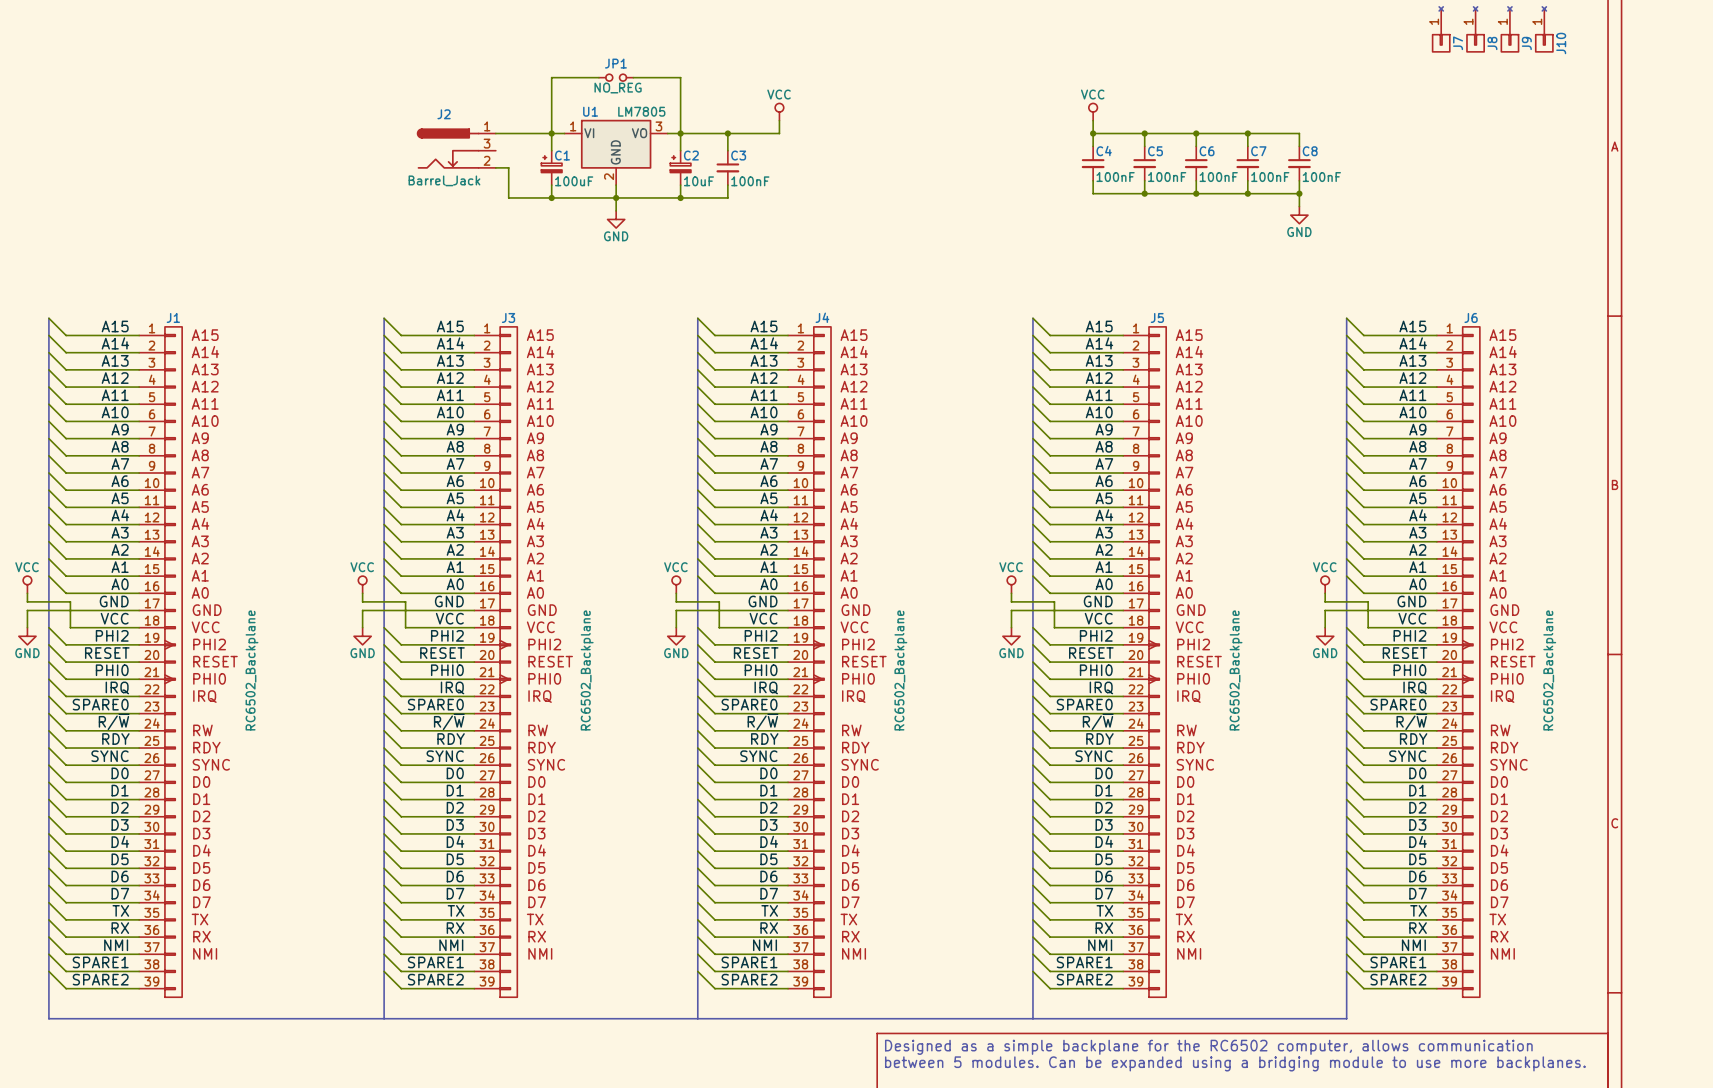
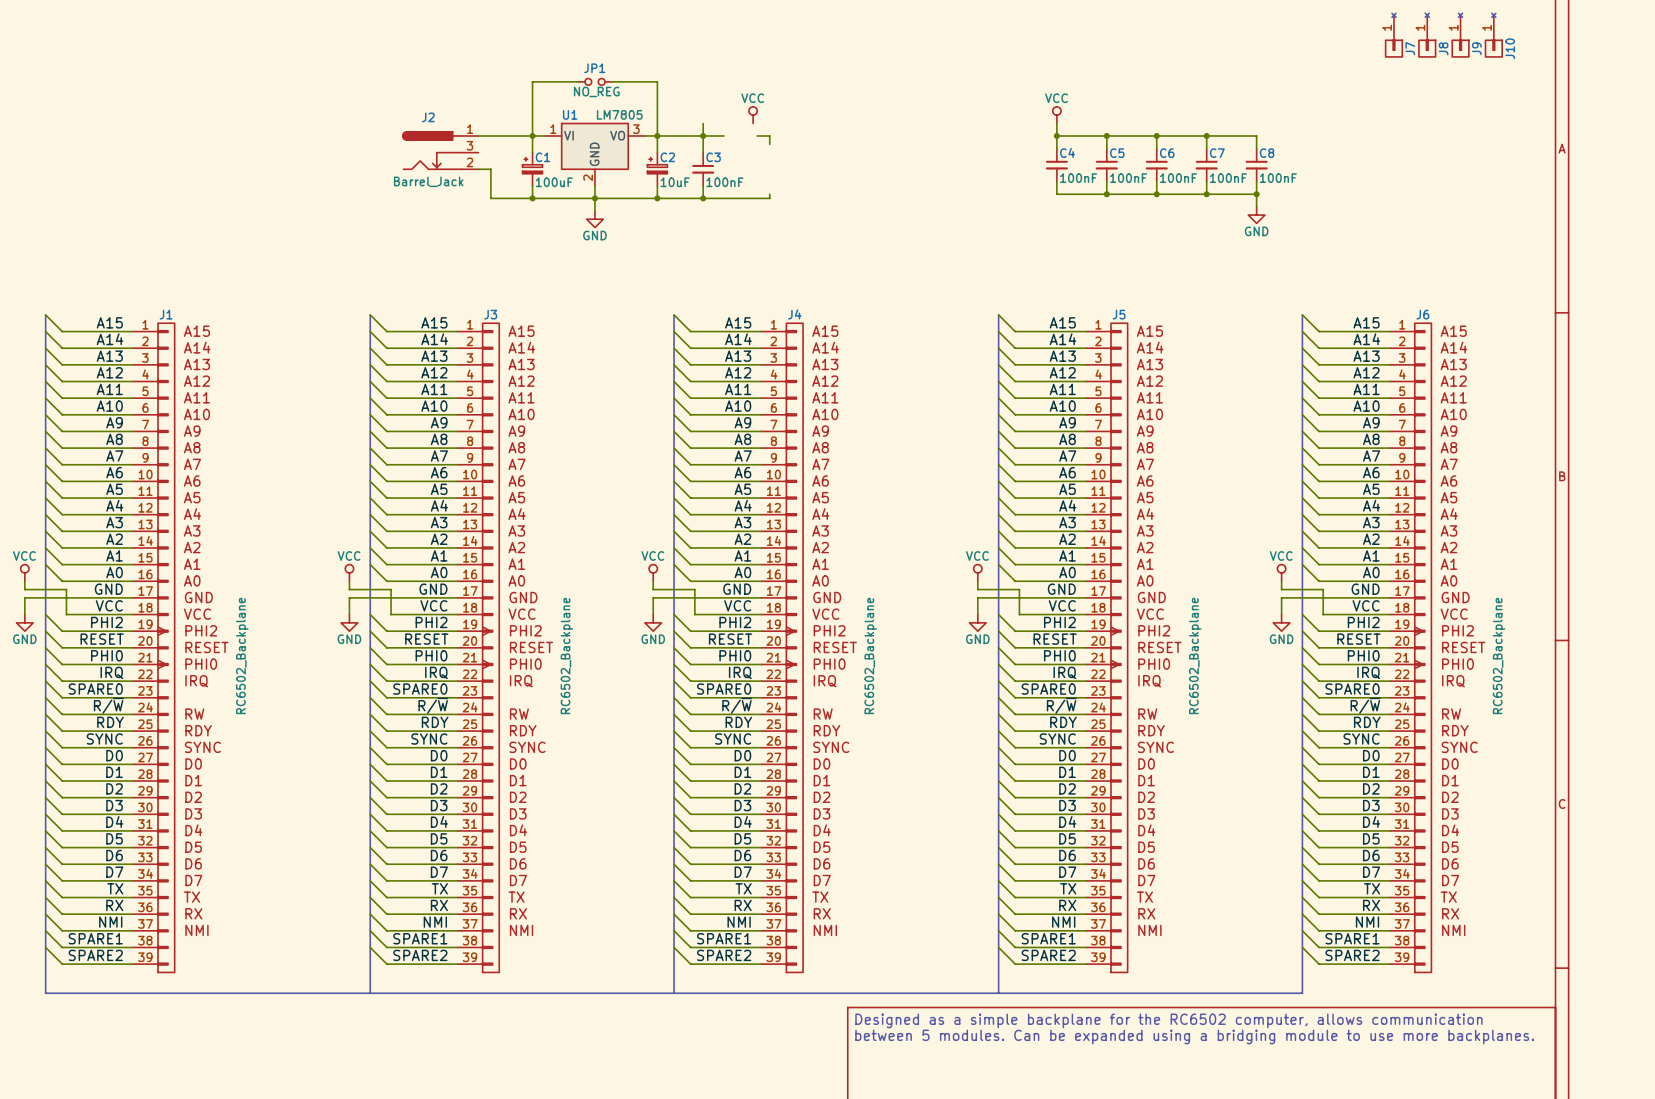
wire: none -> (703, 123) (703, 135)
wire: (779, 120) (779, 133) (749, 133) -> none
wire: none -> (757, 135) (769, 135) (769, 144)
wire: none -> (769, 194) (769, 198) (703, 198)
junction: none -> (703, 198)

